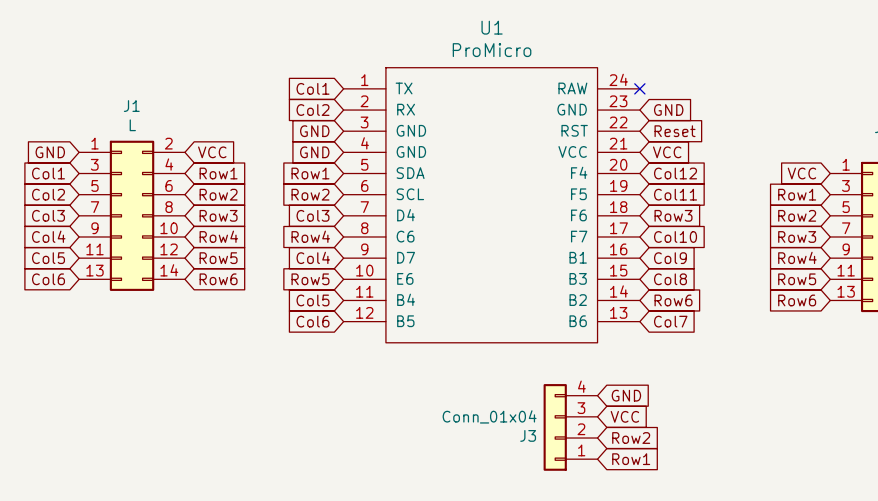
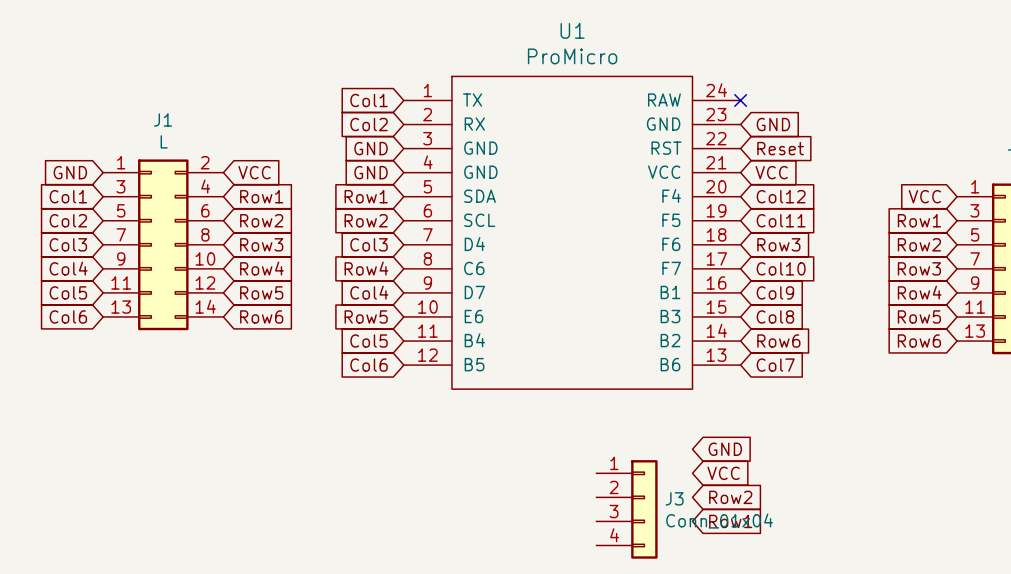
J3 rotation: 0° (555, 427) -> 180° (644, 509)

